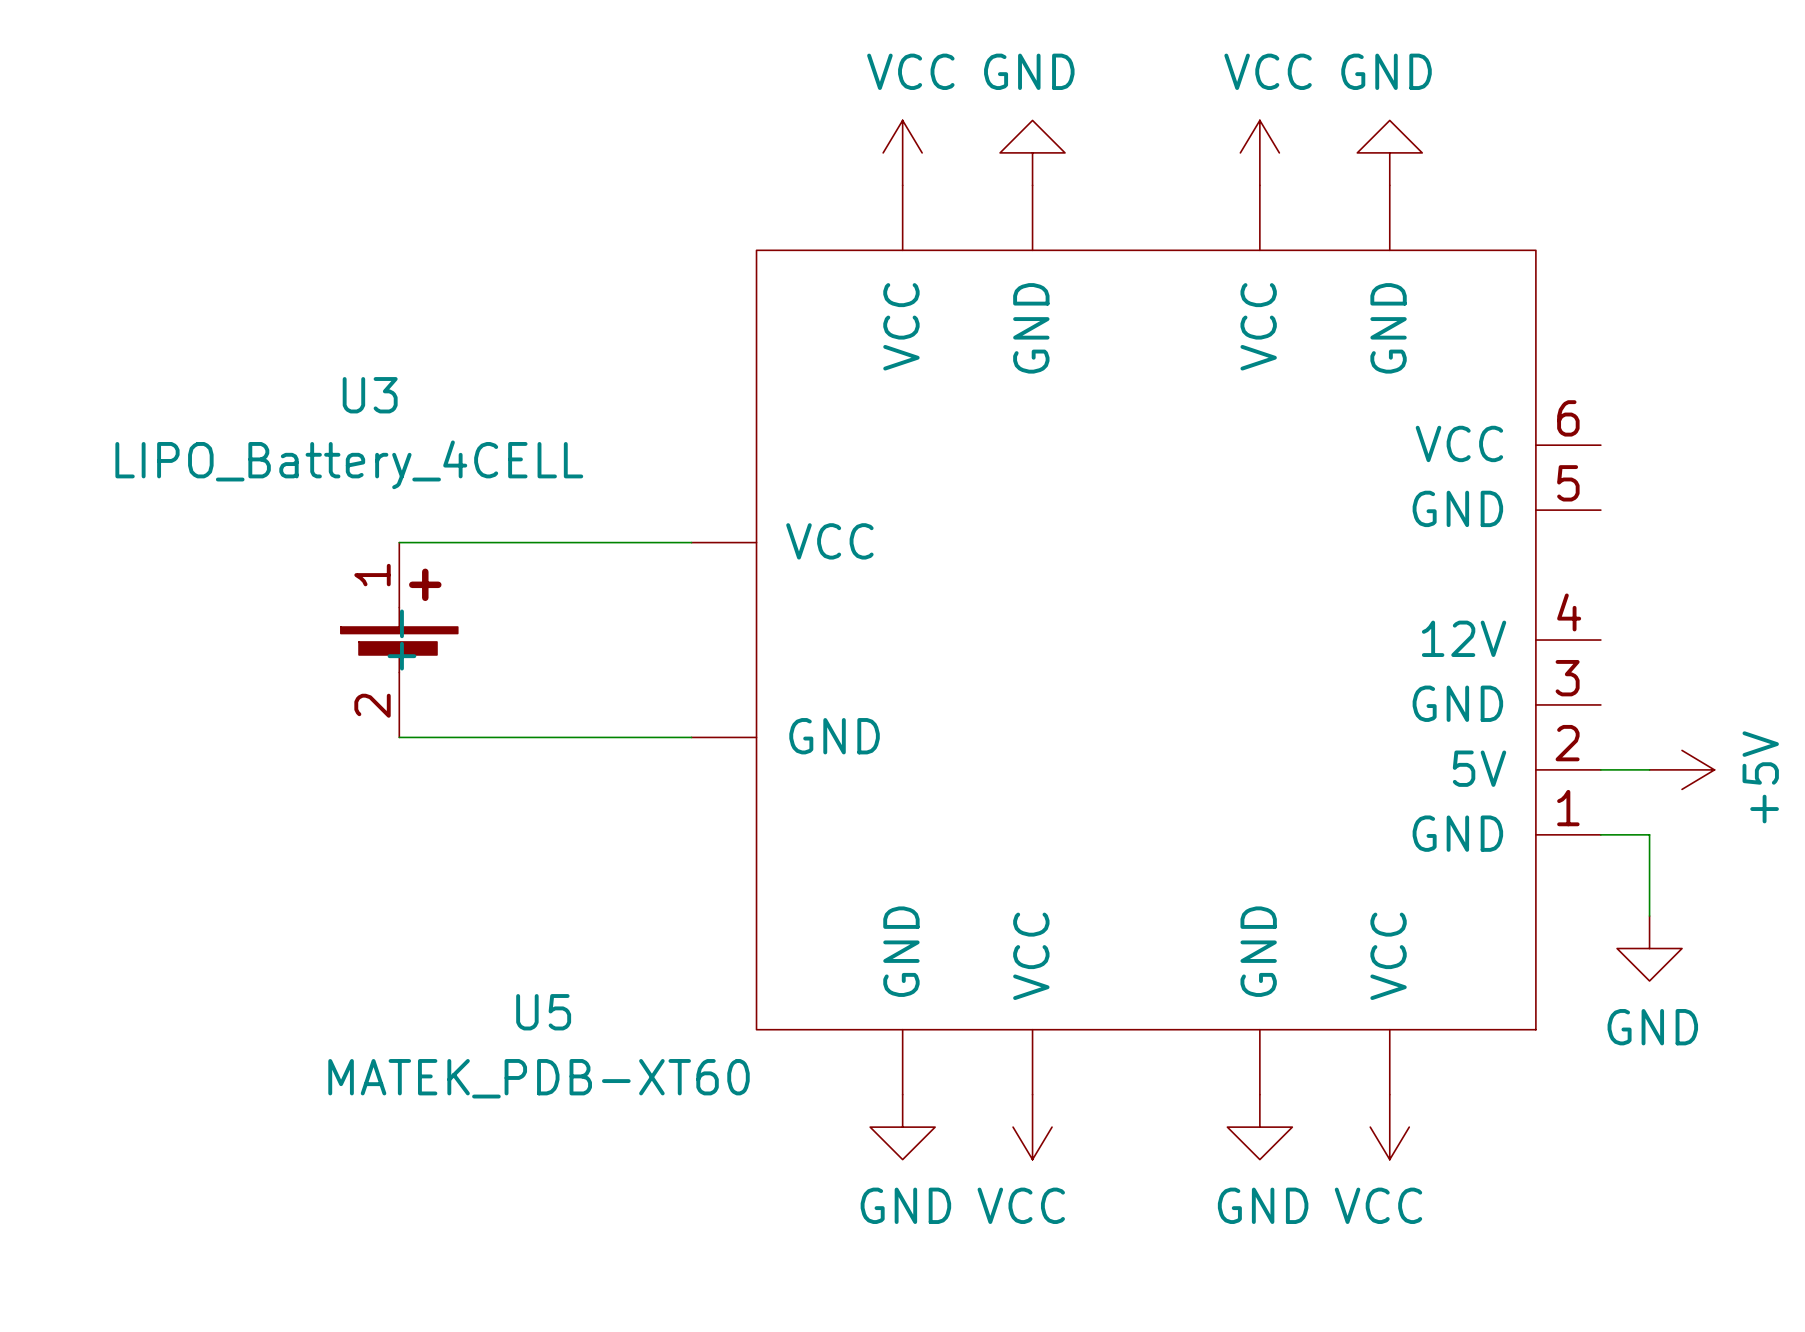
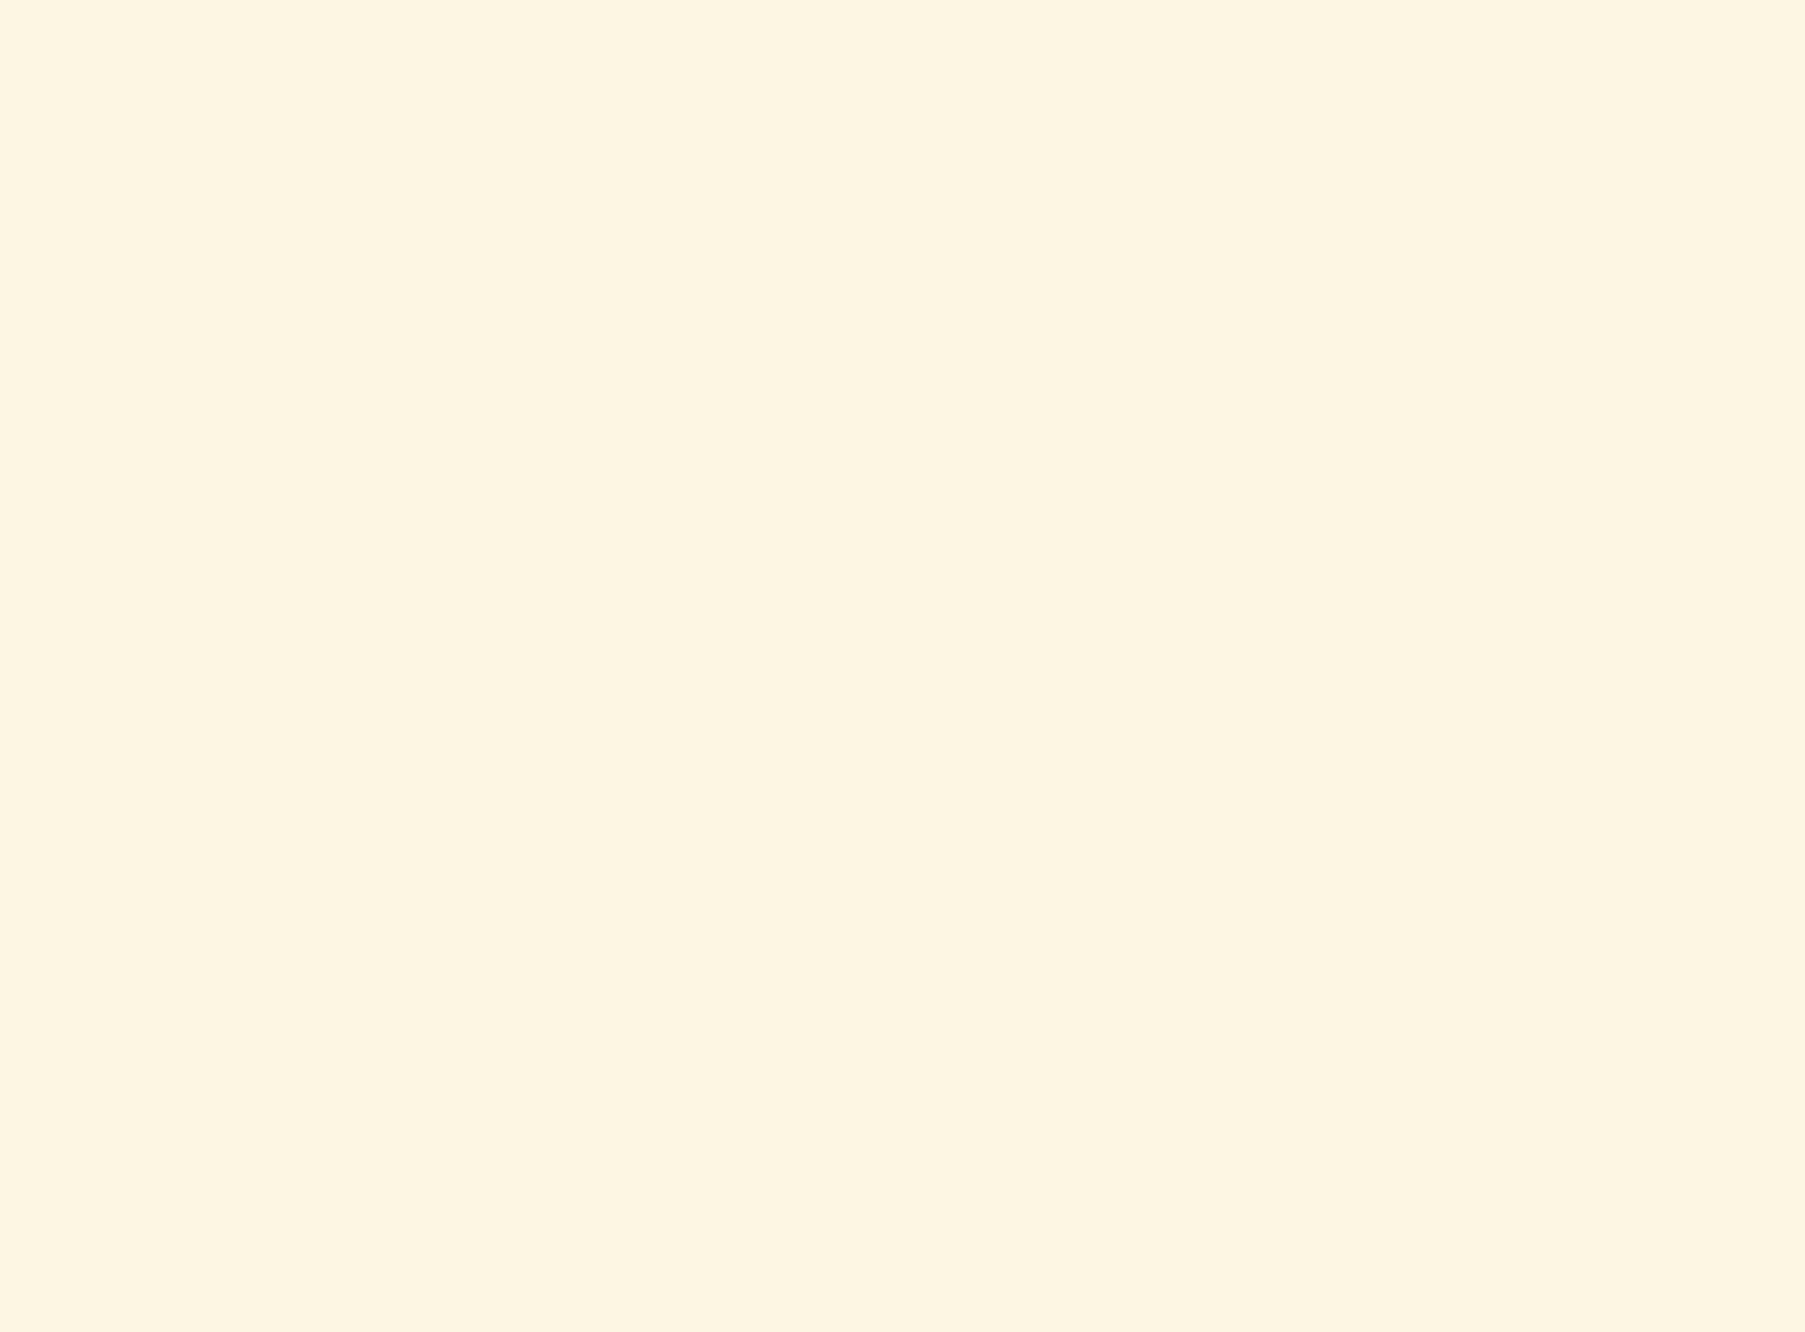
power symbol: VCC (902, 152) -> none
power symbol: GND (1032, 152) -> none
power symbol: VCC (1259, 152) -> none
power symbol: GND (1389, 152) -> none
wire: (399, 542) (691, 542) -> none
U3: LIPO_Battery_4CELL (399, 640) -> none
U5: MATEK_PDB-XT60 (1146, 640) -> none
wire: (399, 737) (691, 737) -> none
wire: (1600, 769) (1649, 769) -> none
power symbol: +5V (1682, 769) -> none
wire: (1600, 834) (1649, 834) (1649, 916) -> none
power symbol: GND (1649, 948) -> none
power symbol: GND (902, 1127) -> none
power symbol: VCC (1032, 1127) -> none
power symbol: GND (1259, 1127) -> none
power symbol: VCC (1389, 1127) -> none

